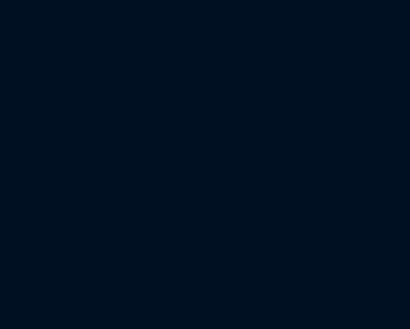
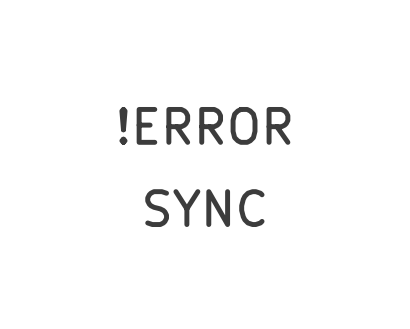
text: none -> !ERROR (204, 125)
text: none -> SYNC (204, 208)

